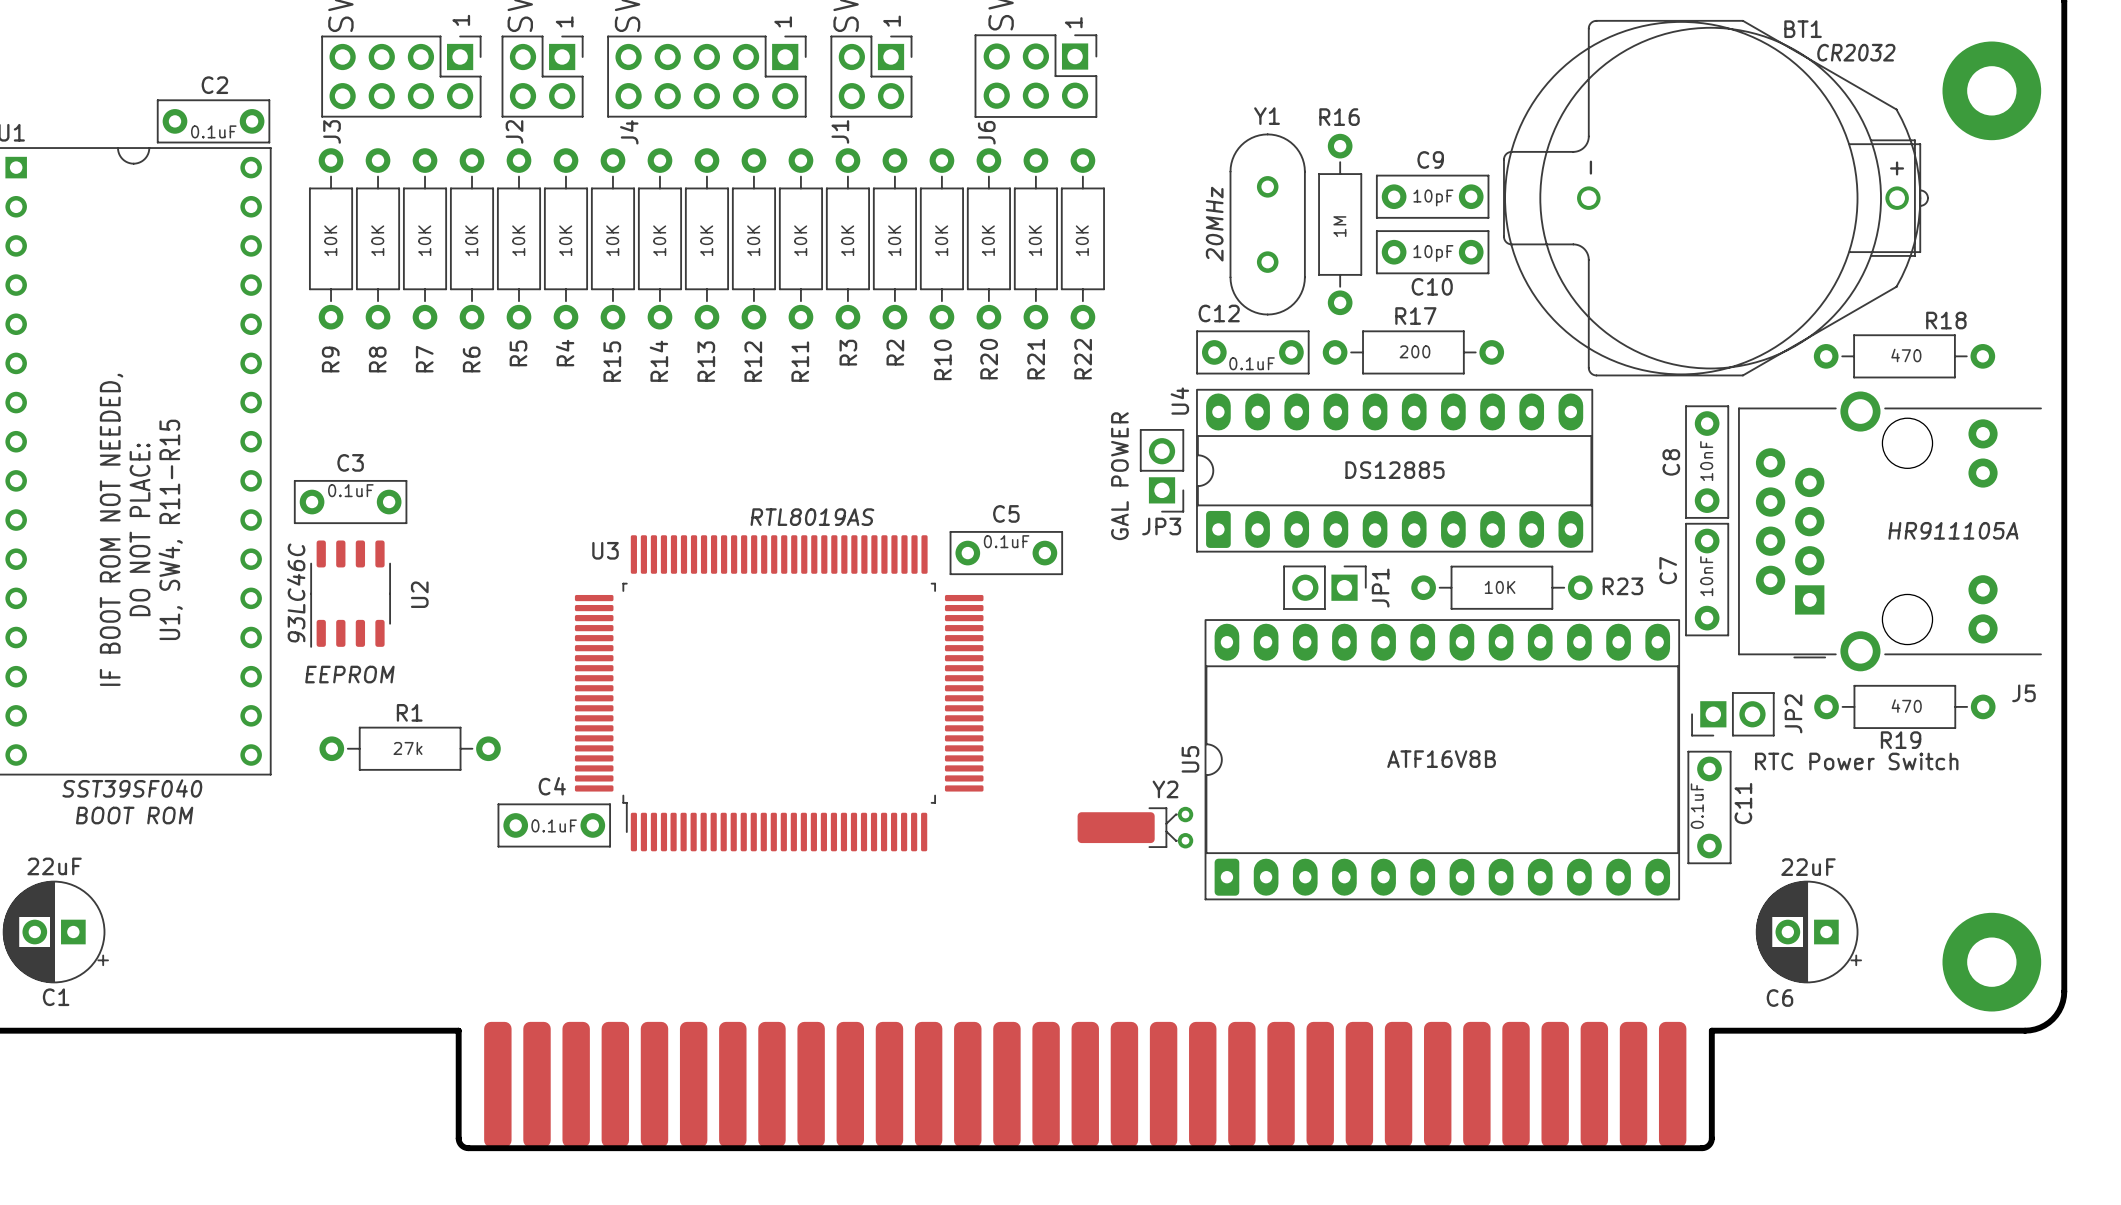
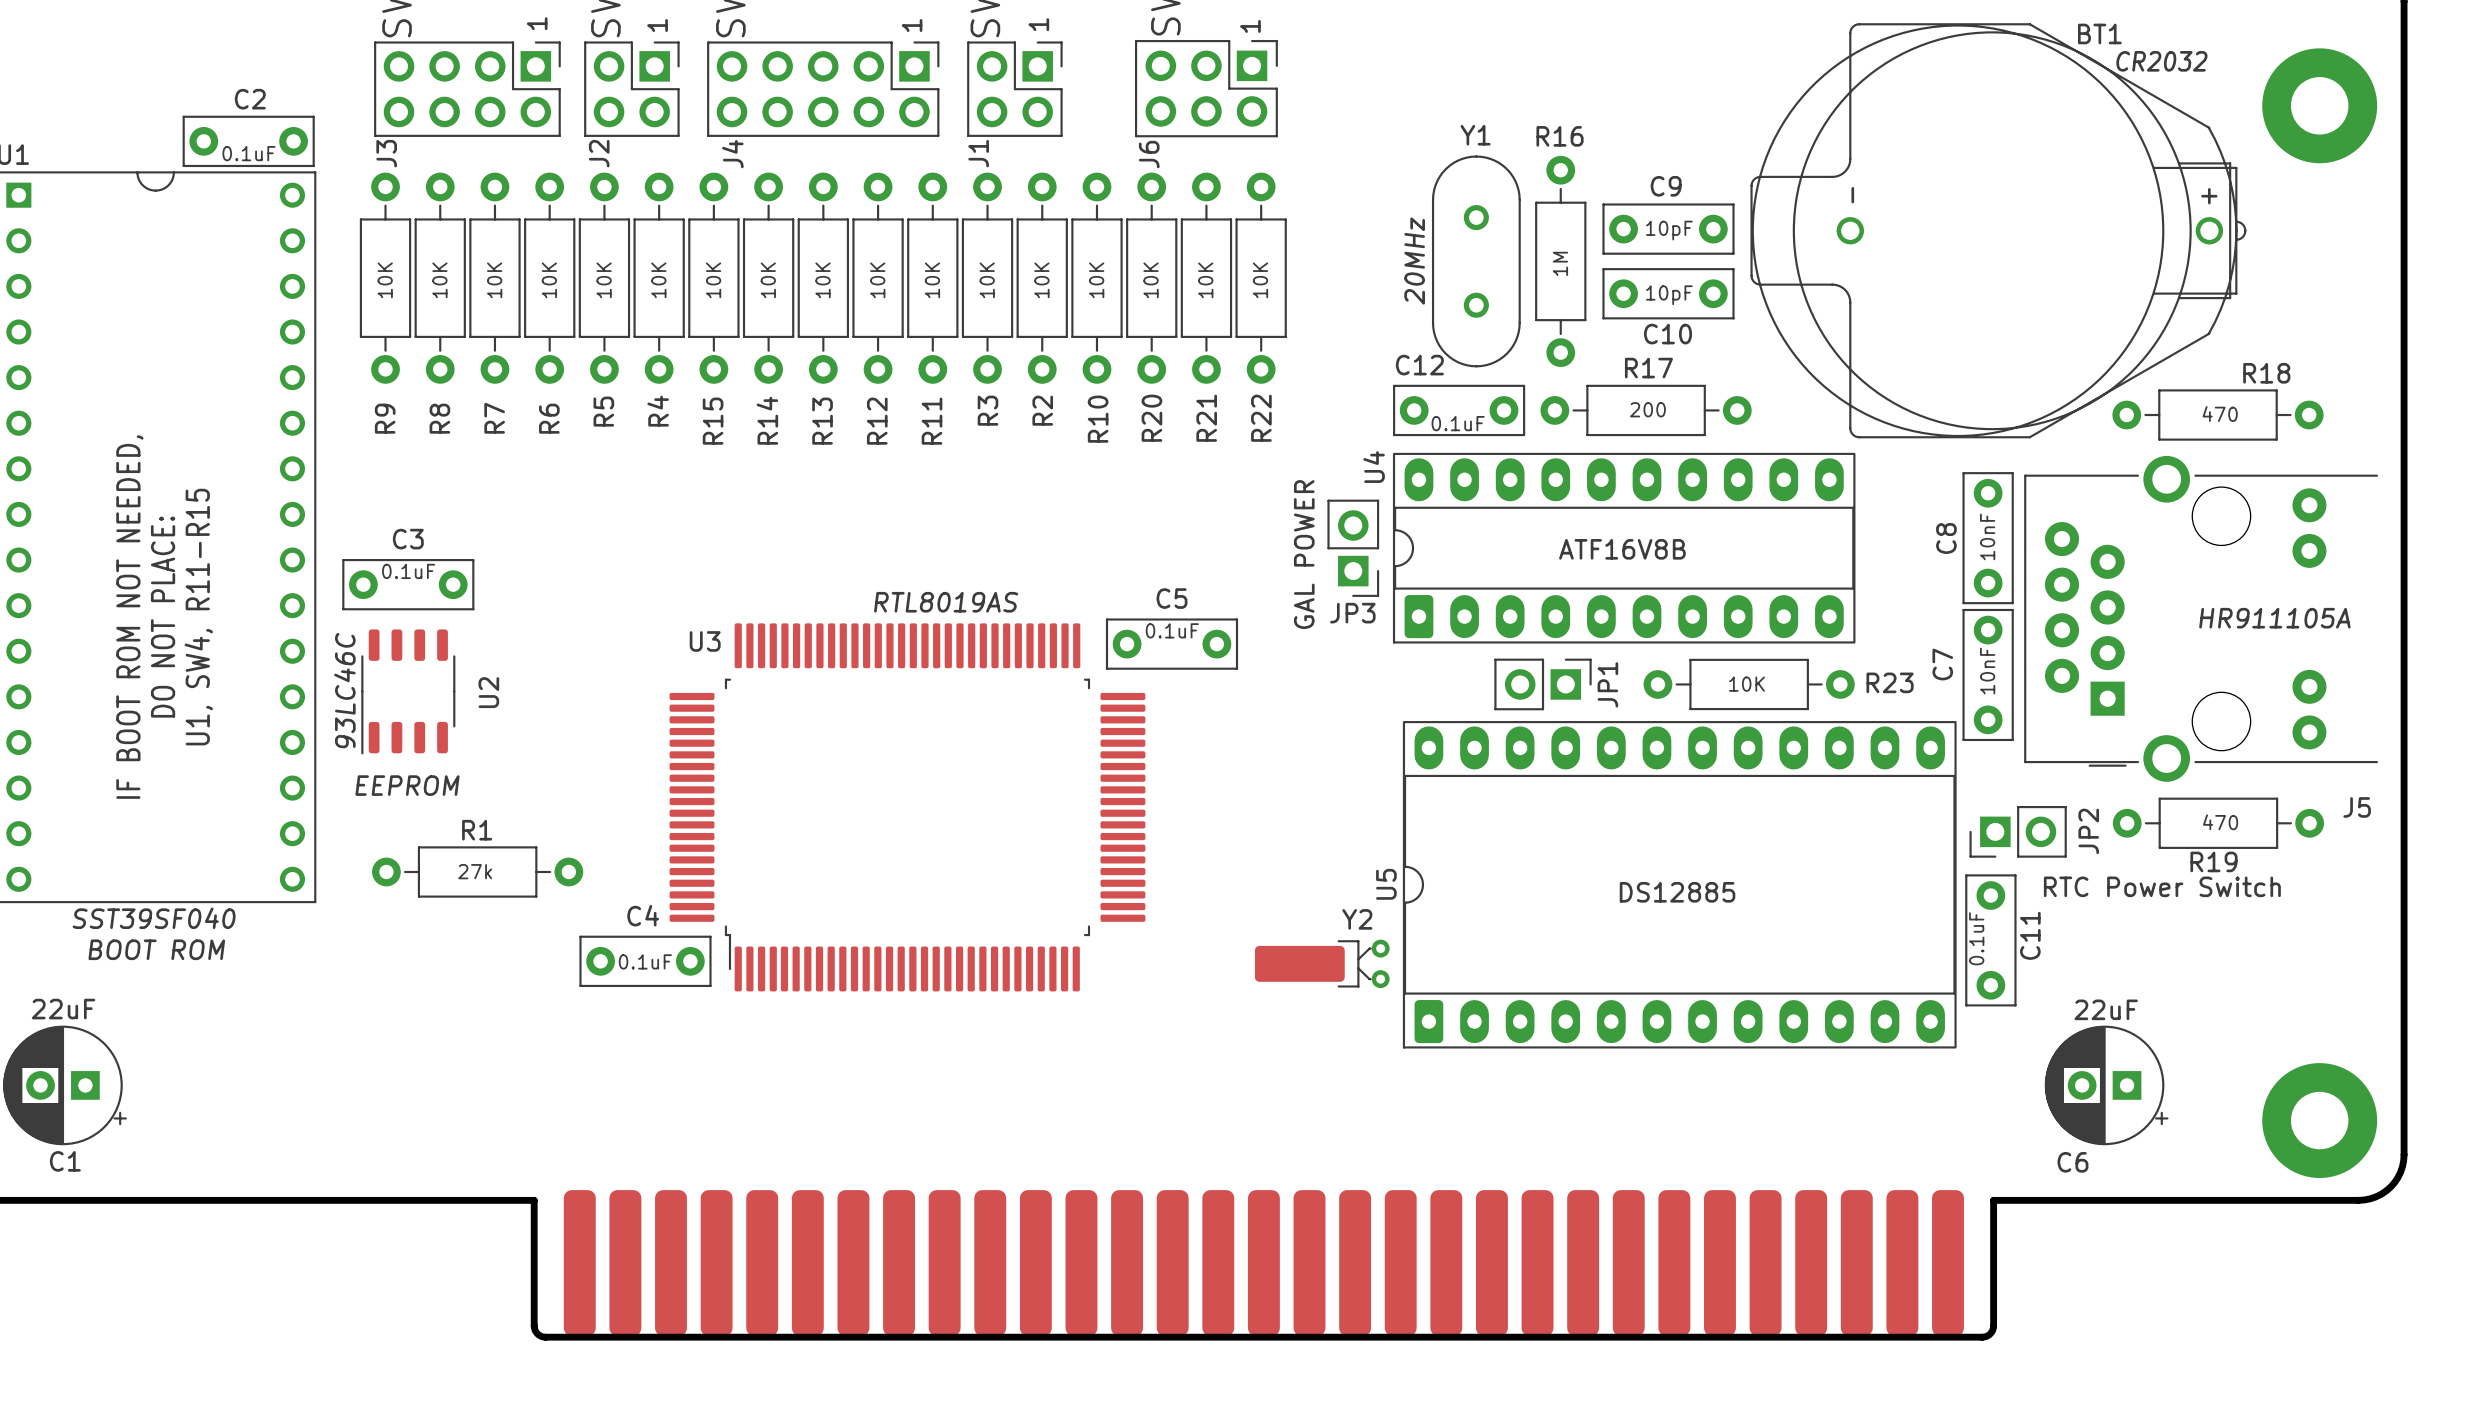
text position: DS12885 (1395, 470) -> DS12885 (1677, 892)
text position: ATF16V8B (1441, 759) -> ATF16V8B (1622, 549)

